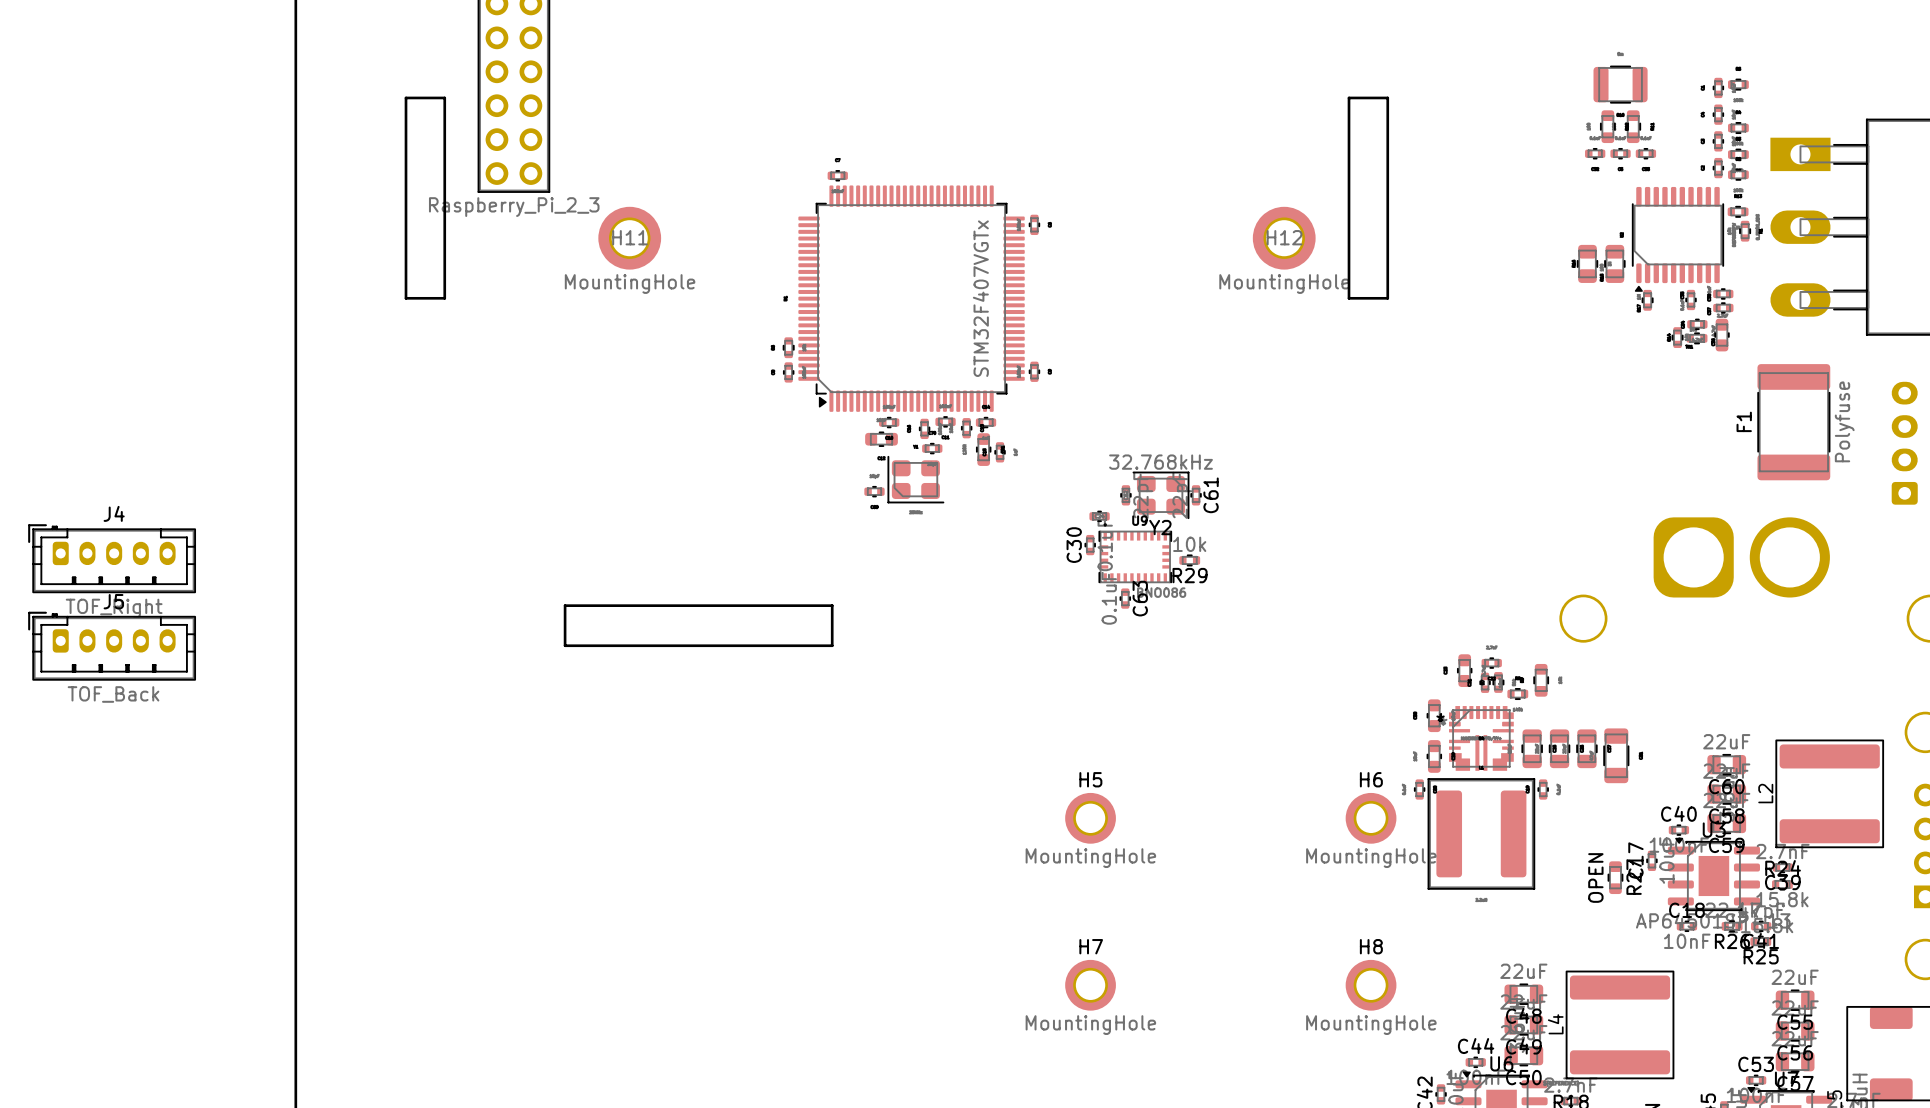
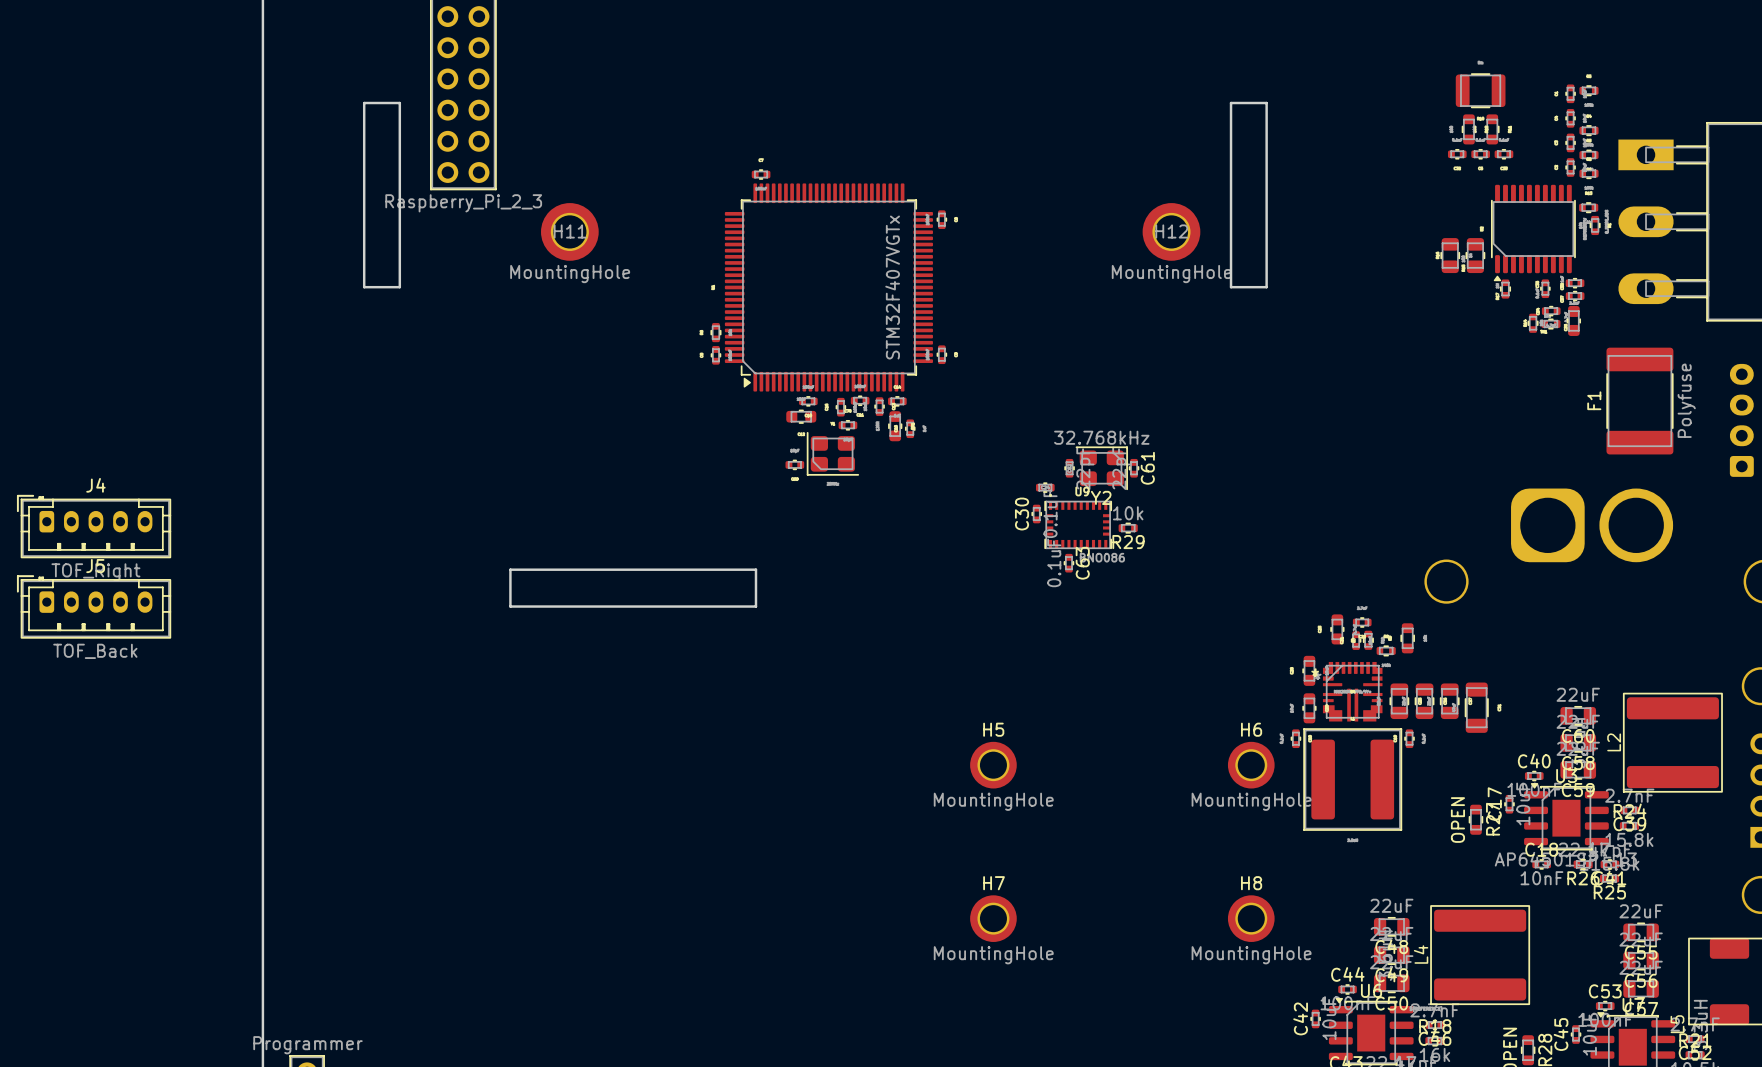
part position: (1125, 495) -> (1069, 468)
Y2 position: (1161, 495) -> (1101, 468)
C61 position: (1196, 495) -> (1134, 468)
part position: (1099, 516) -> (1045, 487)
C30 position: (1090, 545) -> (1036, 514)
U9 position: (1135, 553) -> (1078, 521)
R29 position: (1189, 560) -> (1128, 528)
C63 position: (1125, 598) -> (1068, 563)

